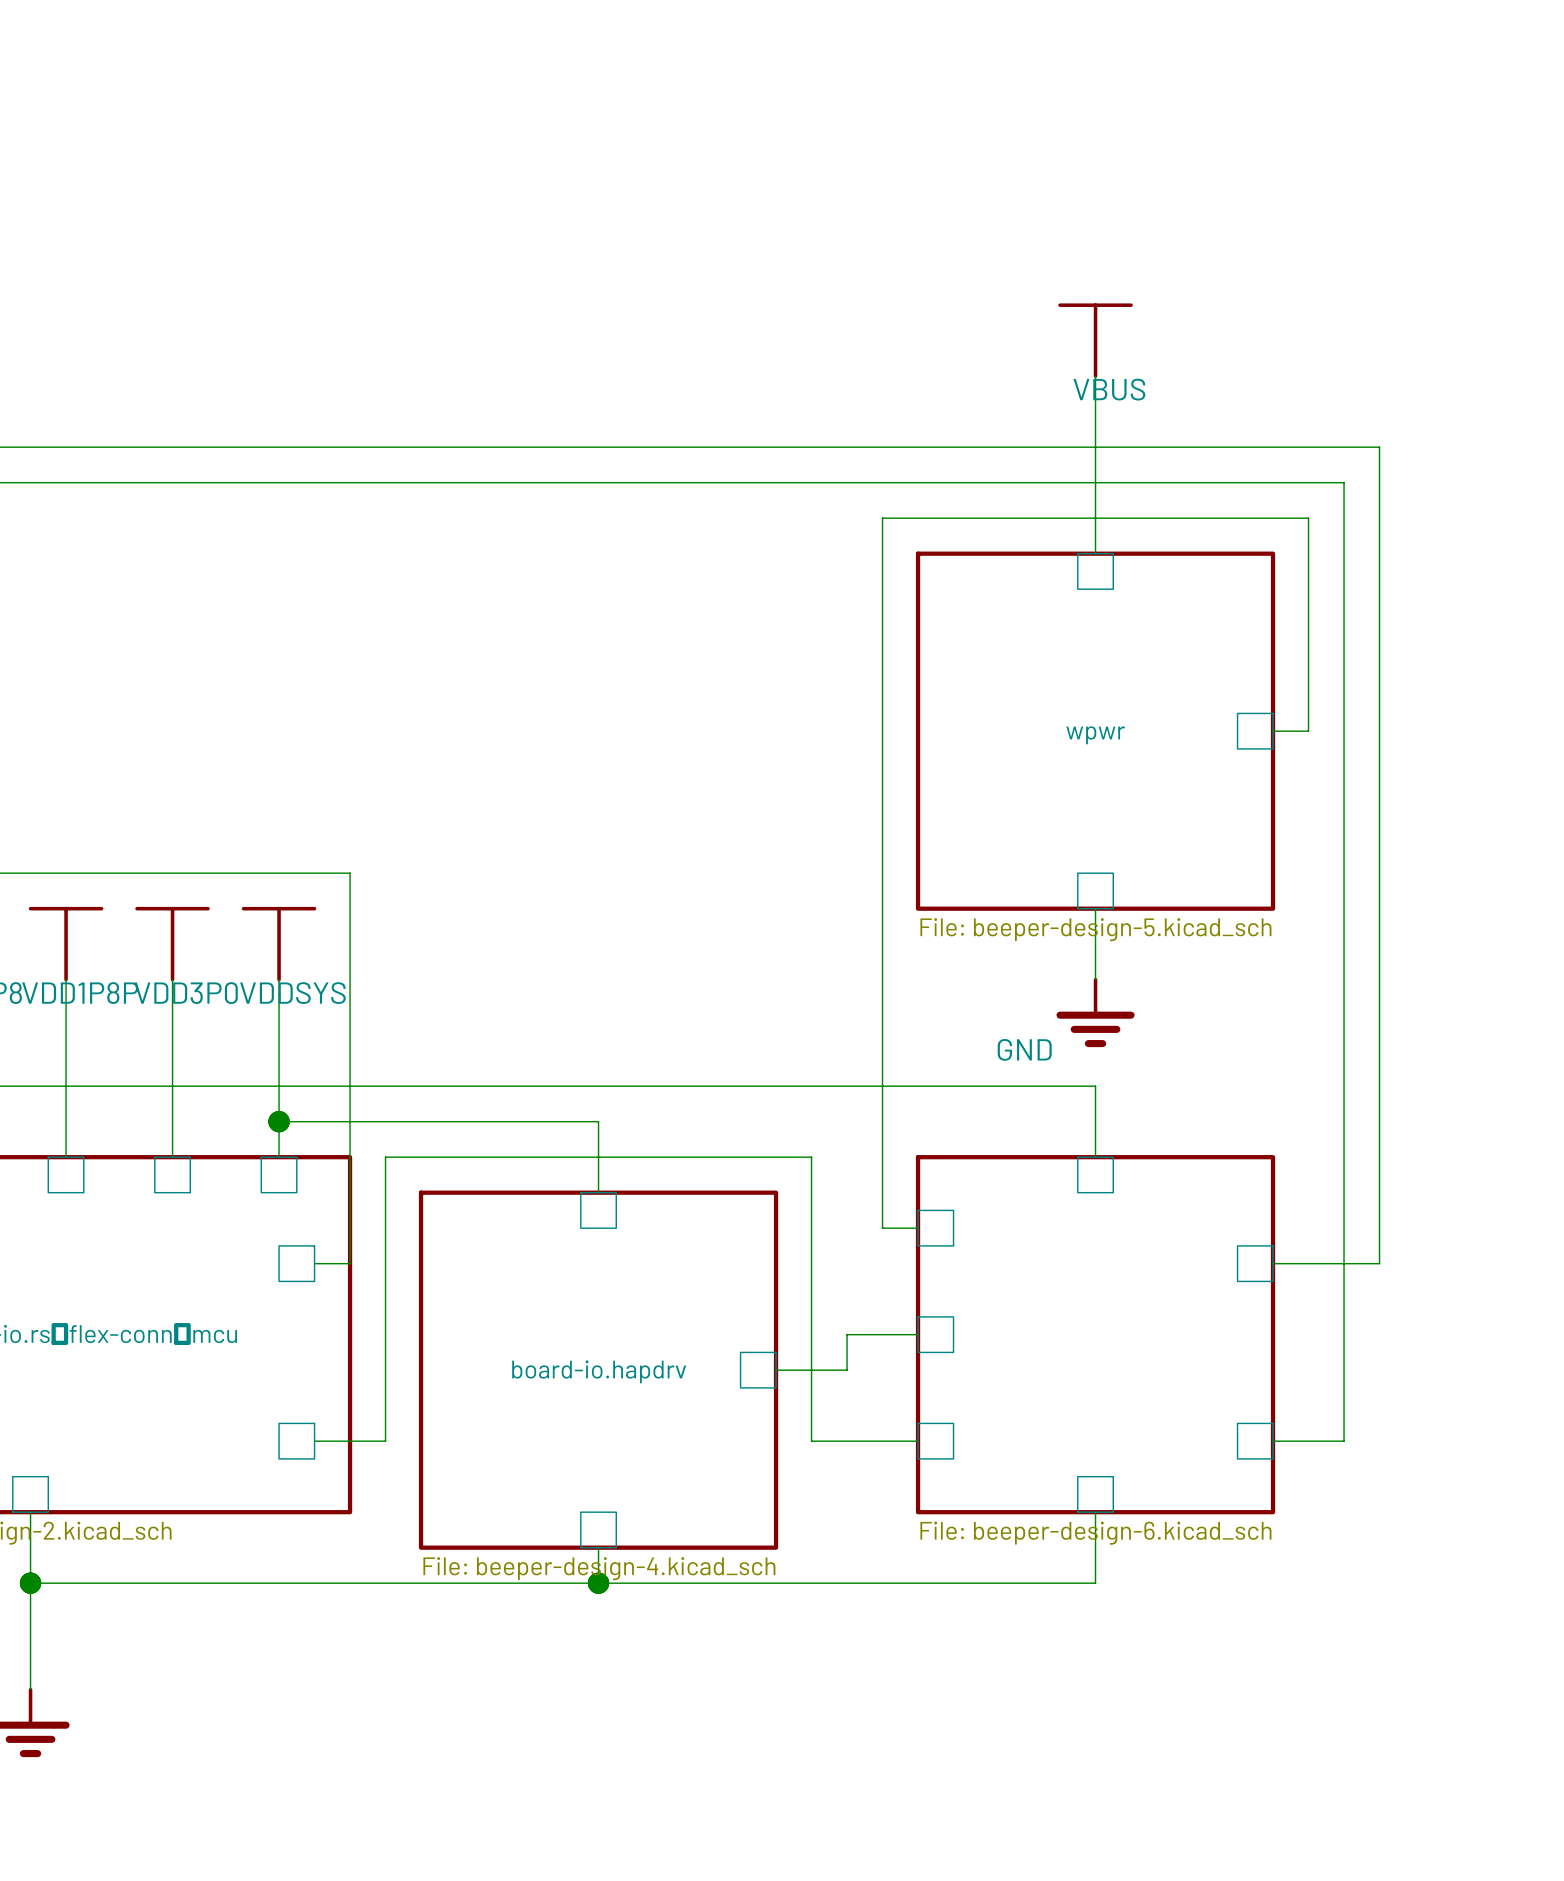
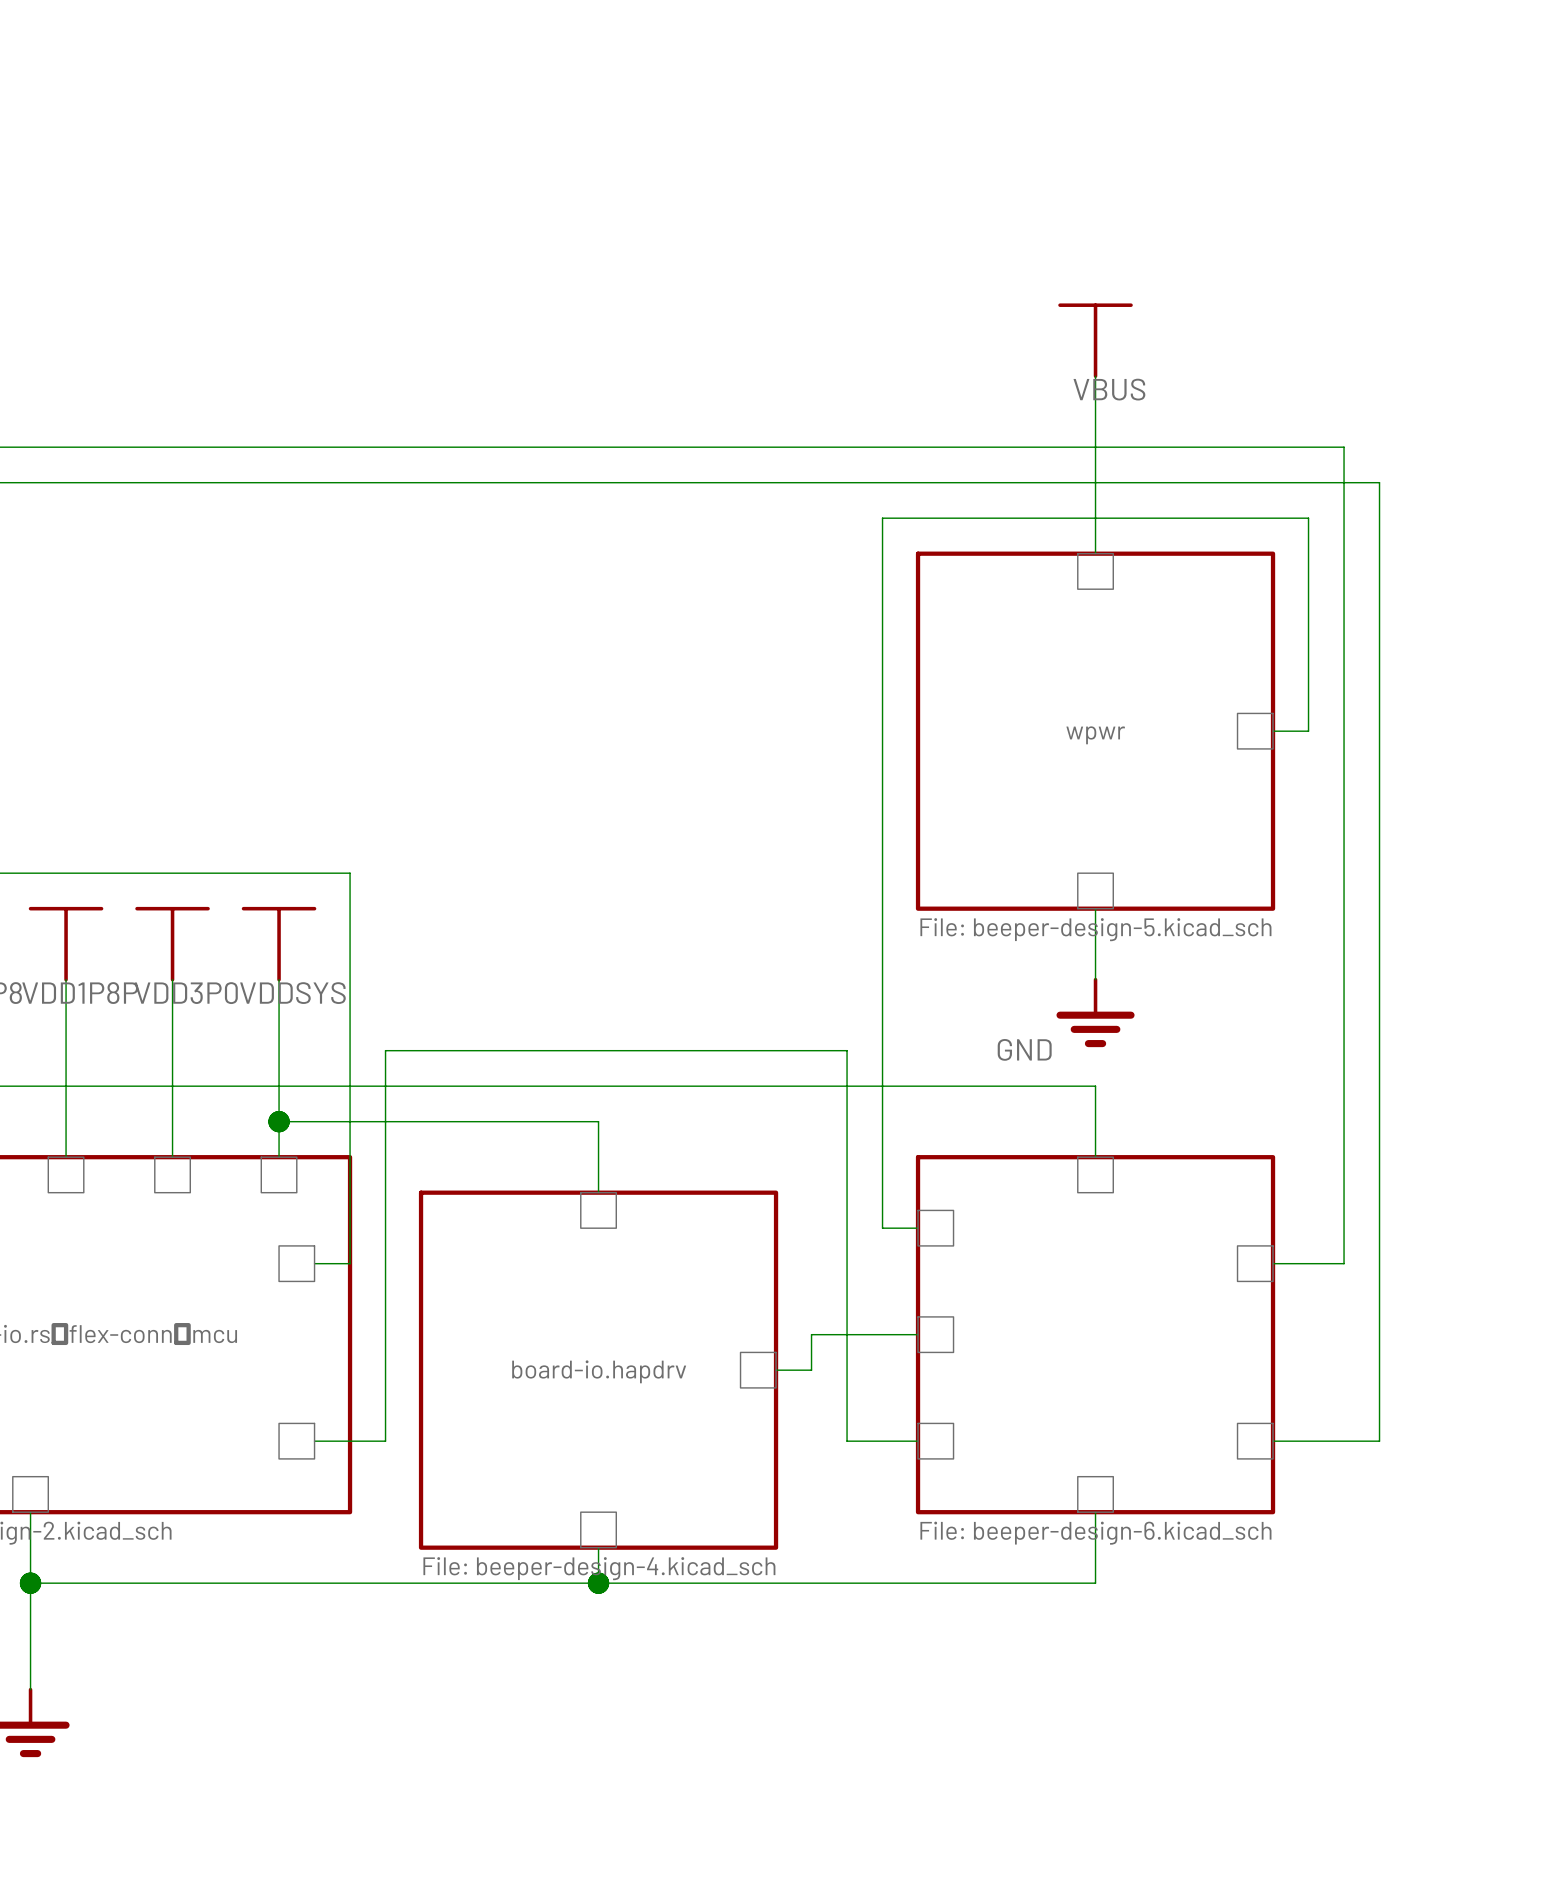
wire: (1344, 447) (1379, 447) (1379, 482) -> (1344, 447) (1344, 482) (1379, 482)
wire: (385, 1157) (811, 1157) (811, 1334) -> (385, 1157) (385, 1050) (847, 1050) (847, 1334) (811, 1334)
wire: (1379, 1263) (1344, 1263) (1344, 1441) -> (1379, 1263) (1379, 1441) (1344, 1441)
wire: (847, 1370) (811, 1370) (811, 1441) (847, 1441) -> (847, 1370) (847, 1441)

